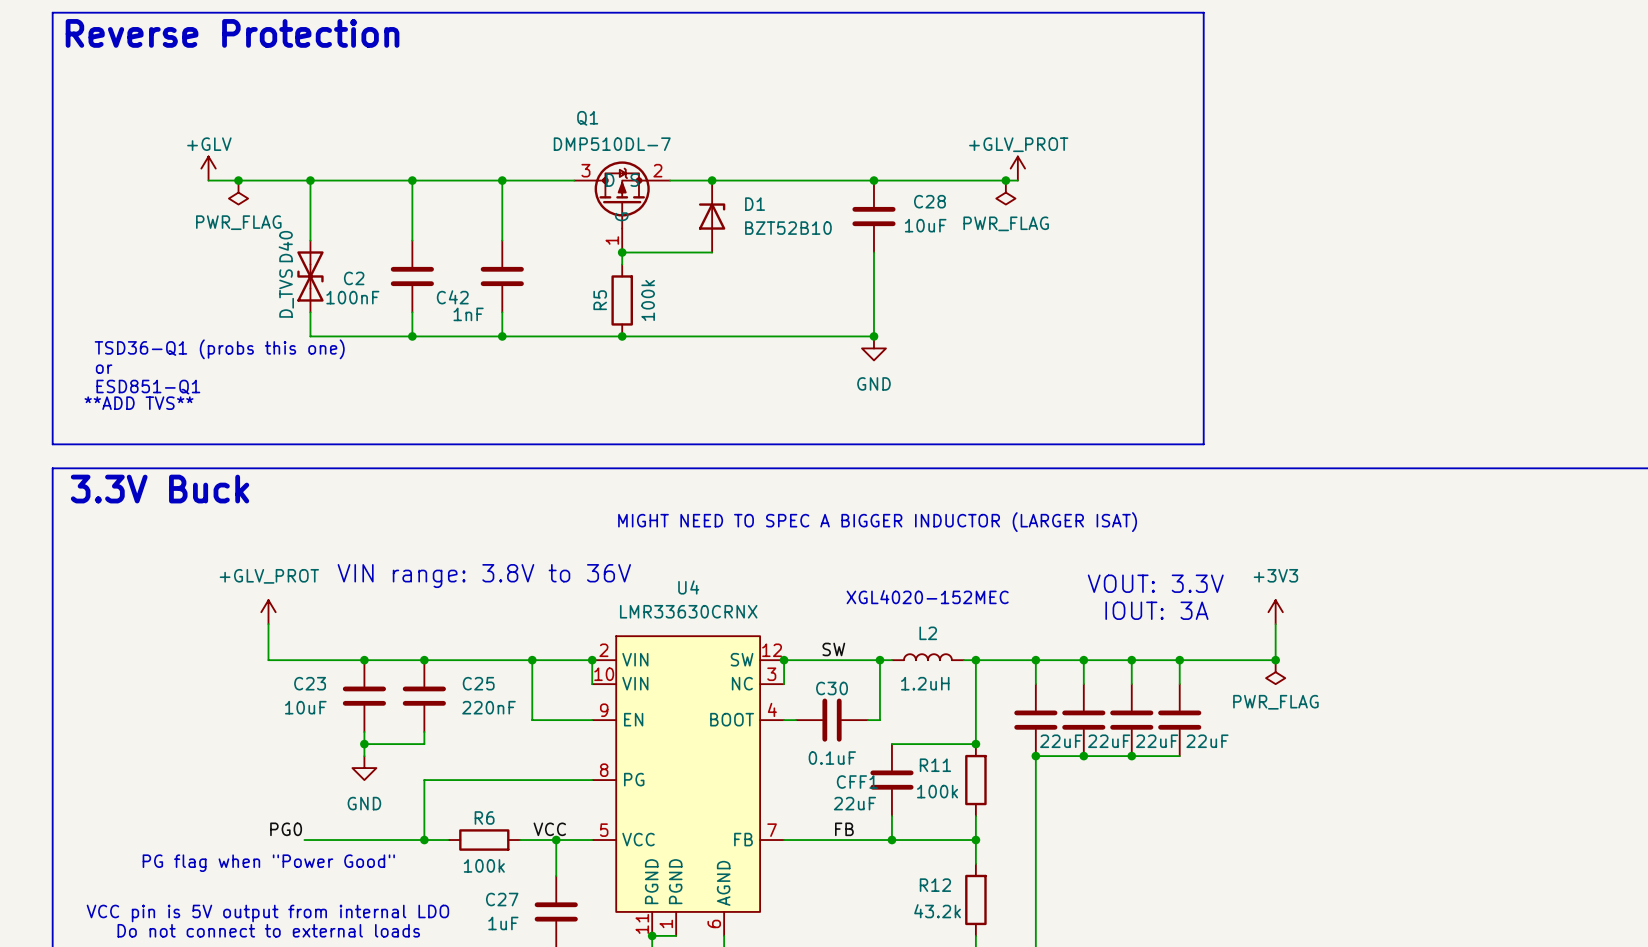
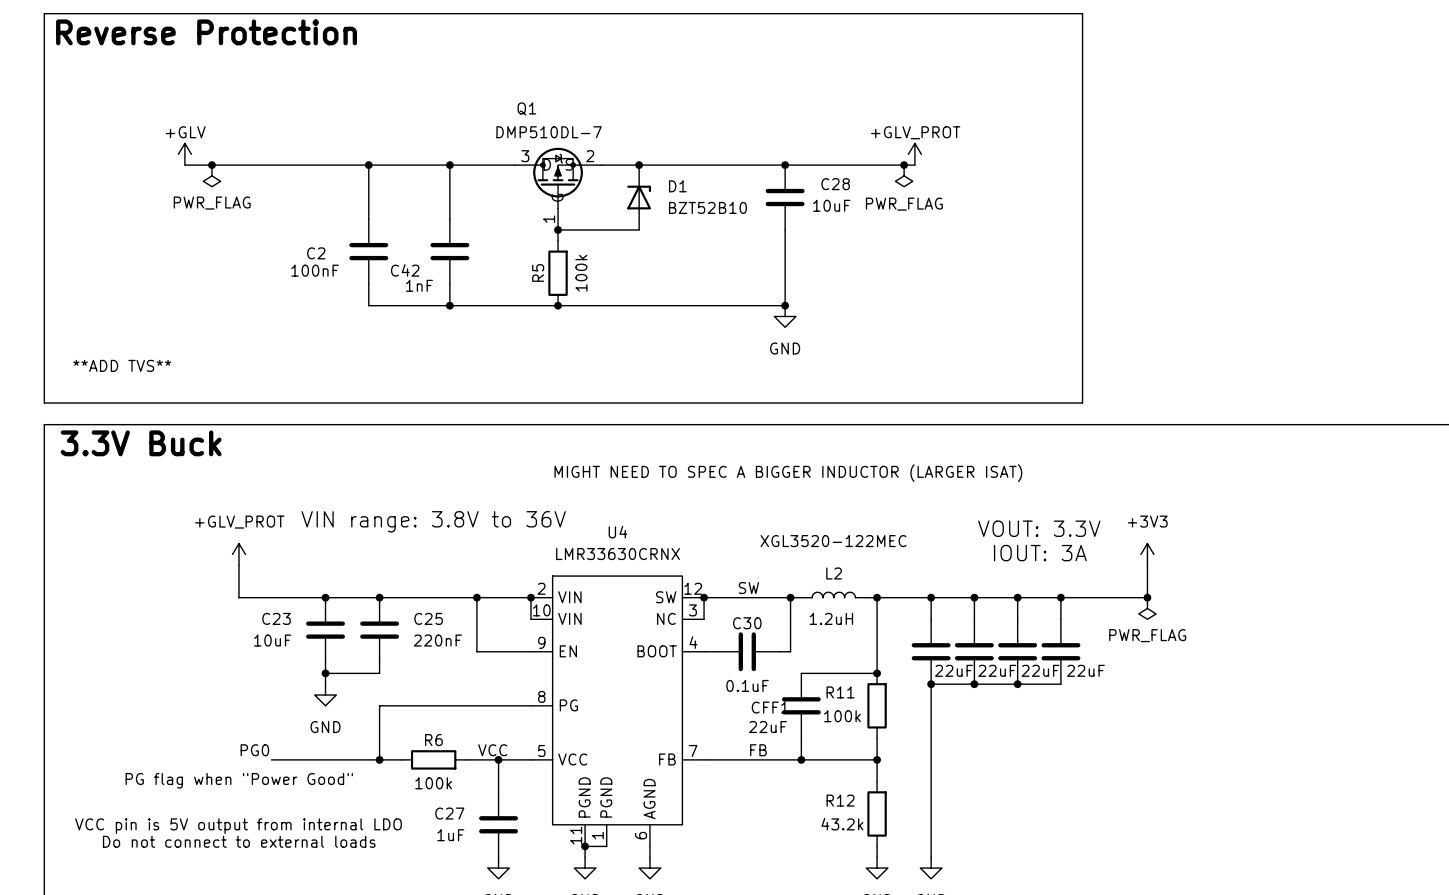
wire: (310, 180) (310, 240) -> none
junction: (310, 180) -> none
D40: D_TVS (310, 276) -> none
wire: (310, 312) (310, 336) (412, 336) -> none
junction: (412, 336) -> none
text: TSD36-Q1 (probs this one) (219, 349) -> none
text: or (104, 369) -> none
text: ESD851-Q1 (148, 387) -> none
text: XGL4020-152MEC (927, 597) -> XGL3520-122MEC (833, 541)

